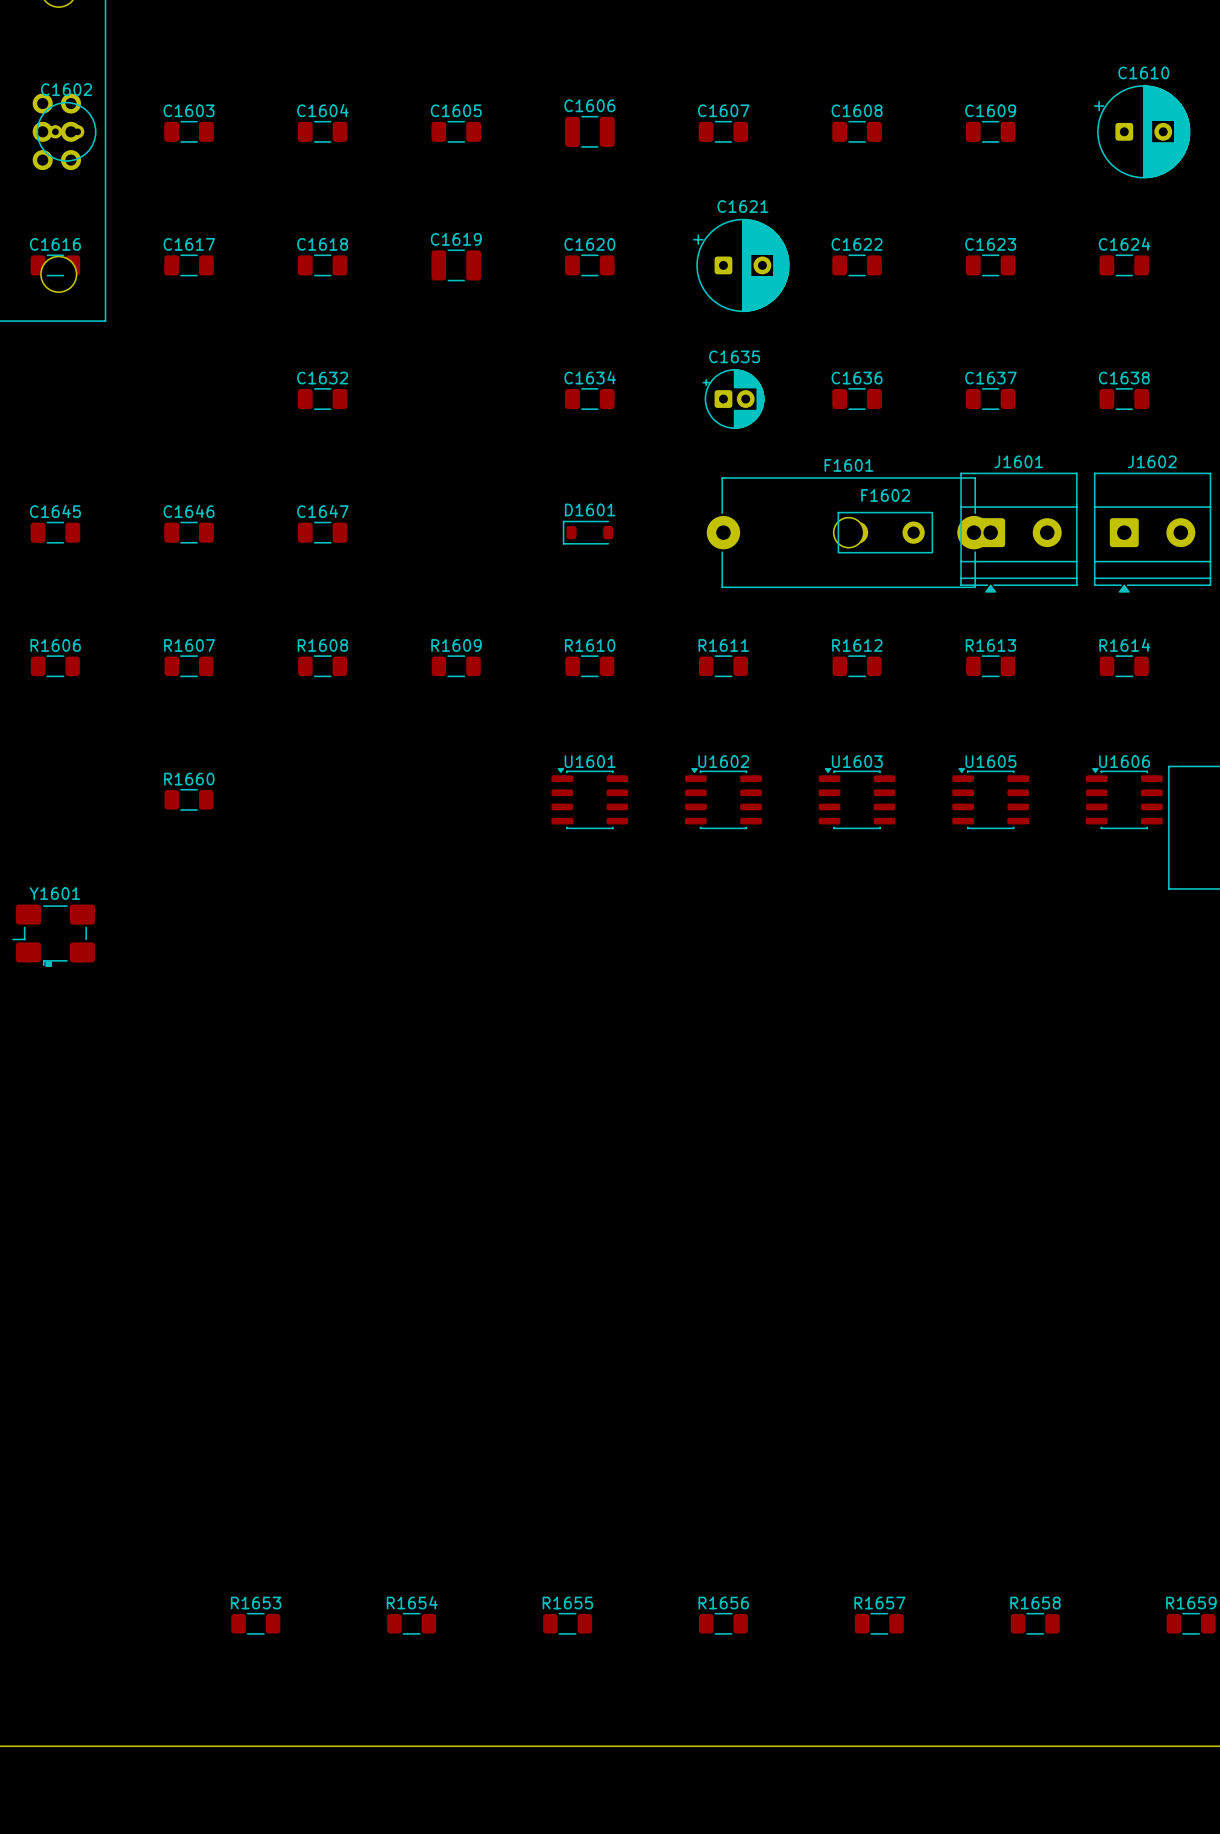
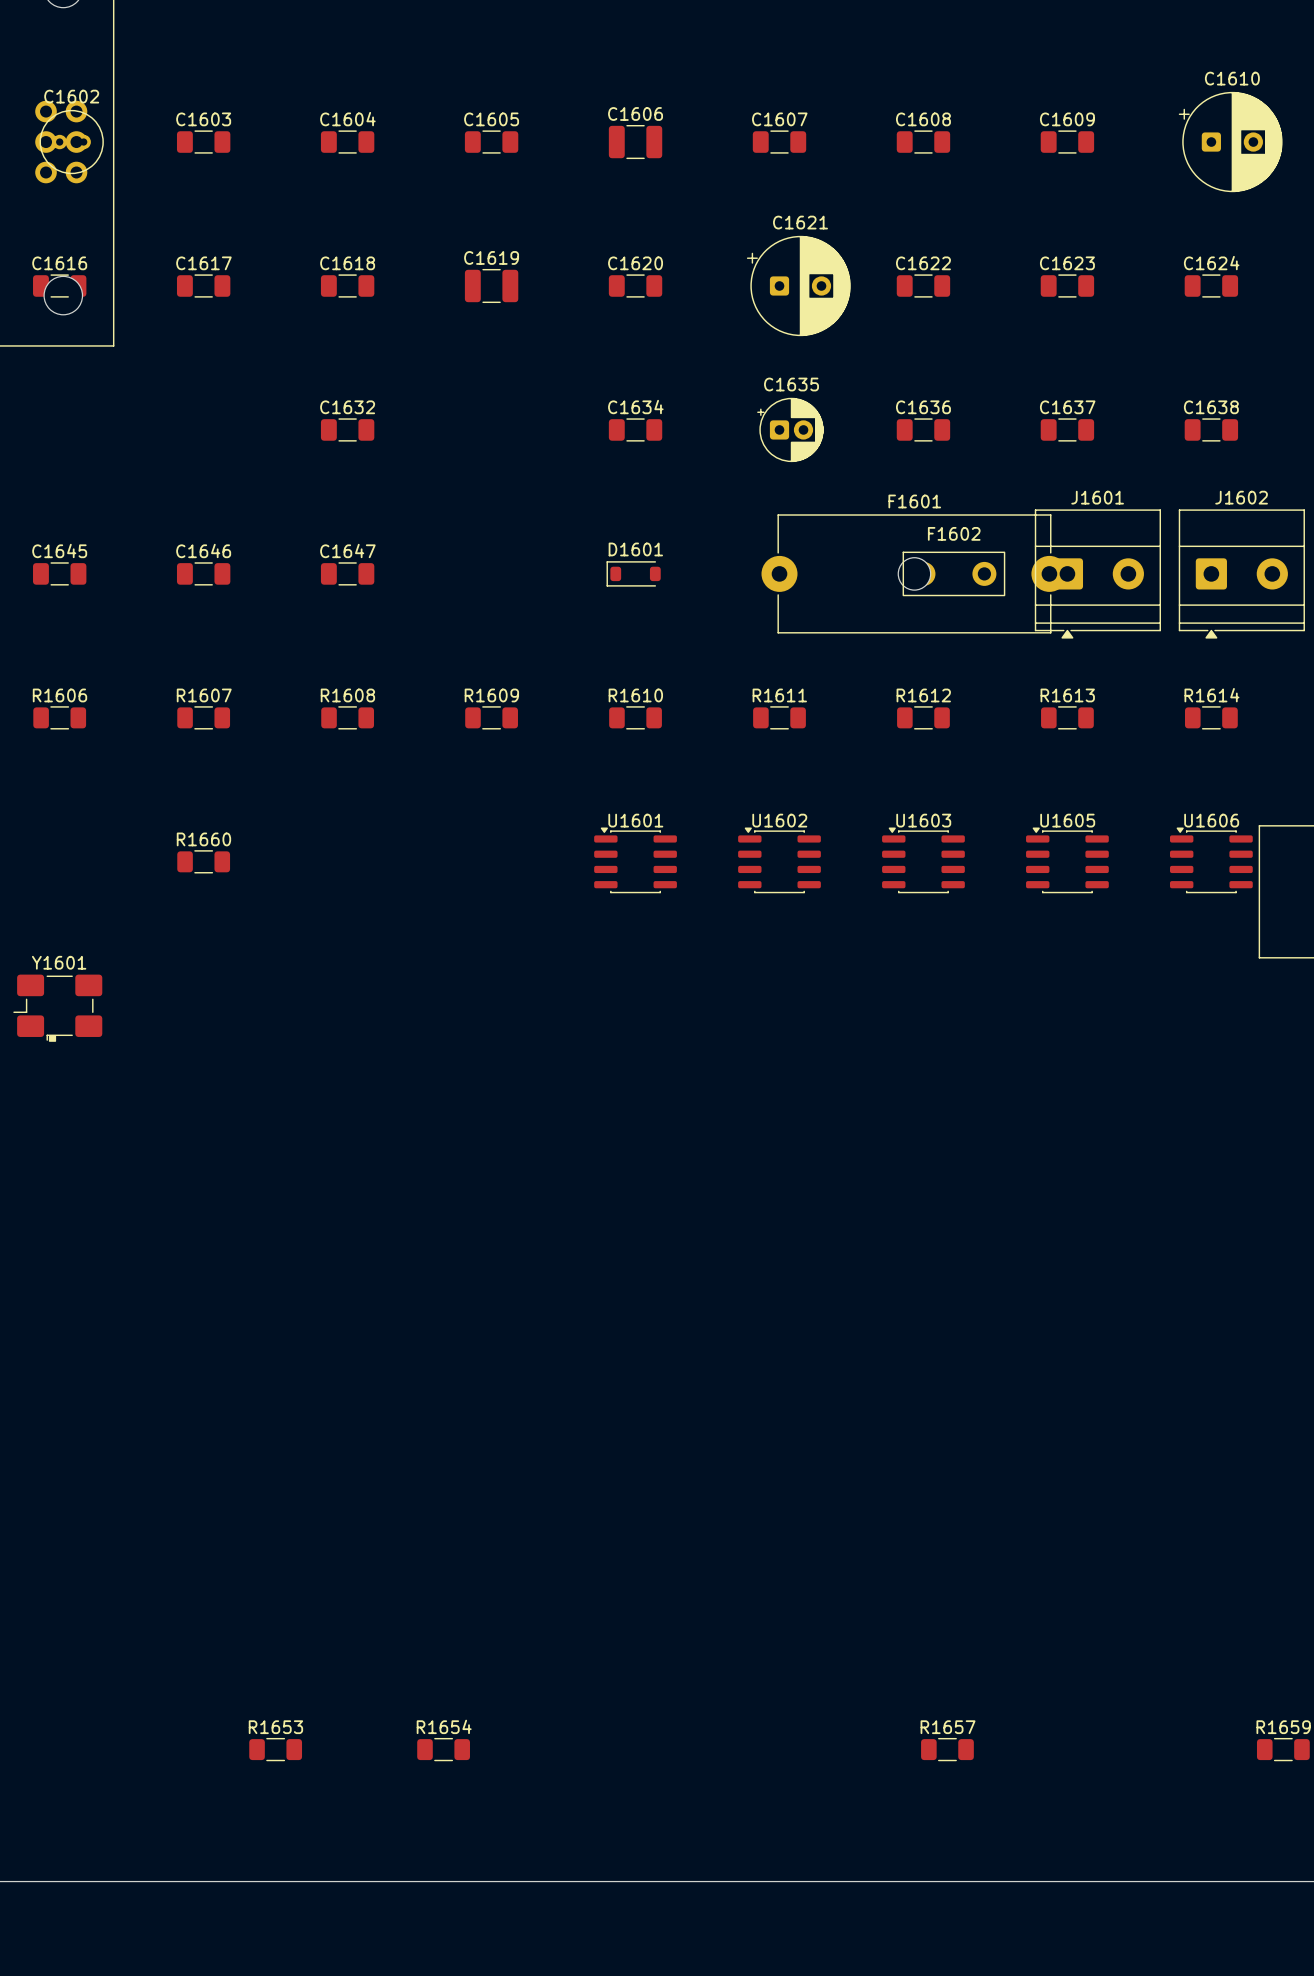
R1655: (567, 1623) -> none
R1656: (723, 1623) -> none
R1658: (1035, 1623) -> none

